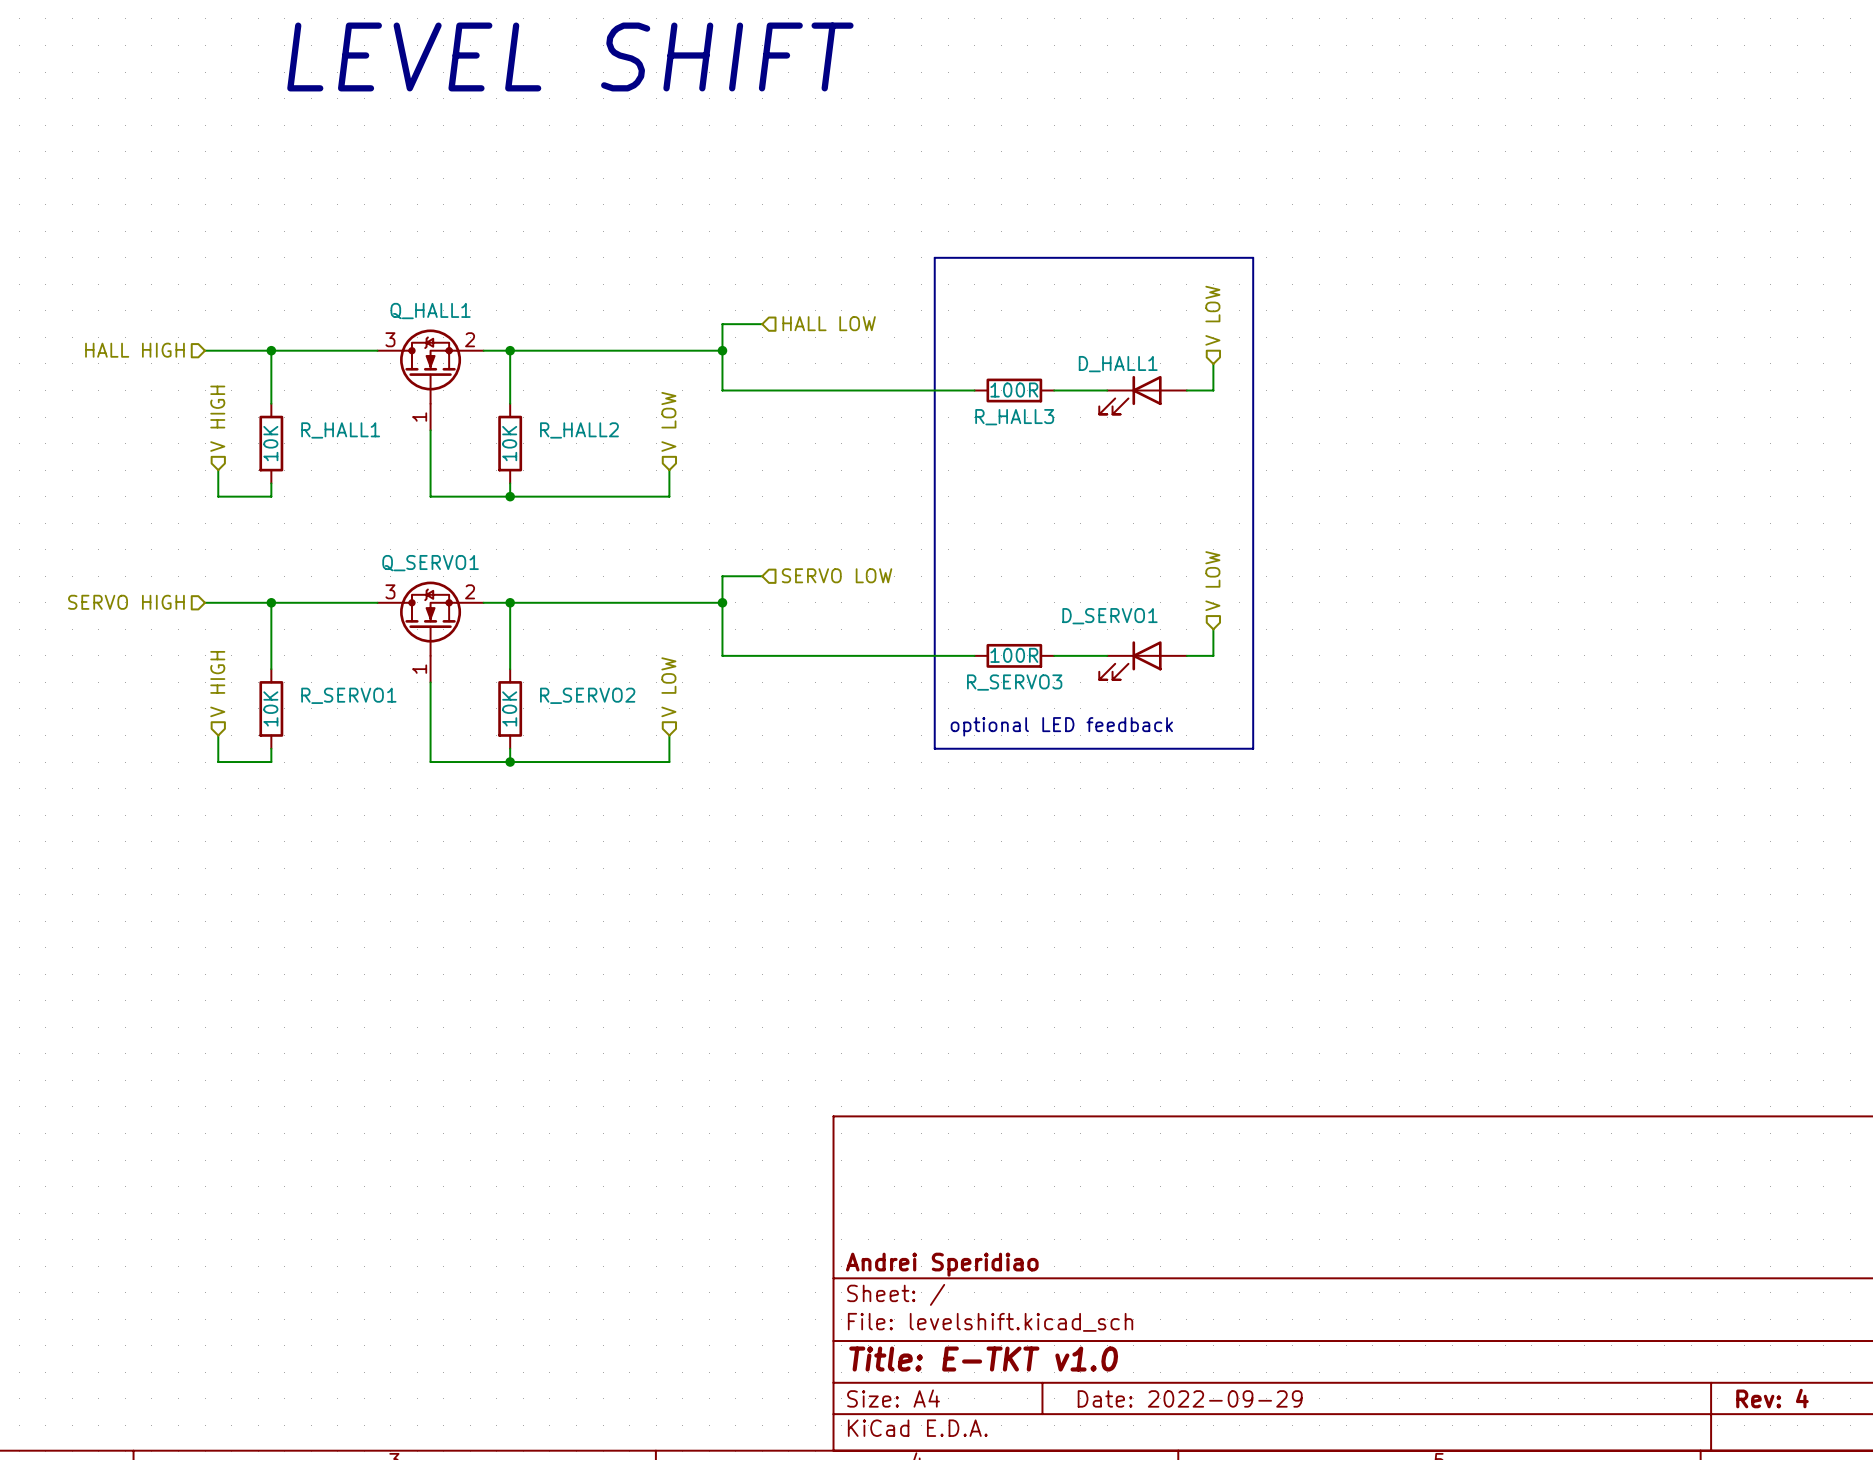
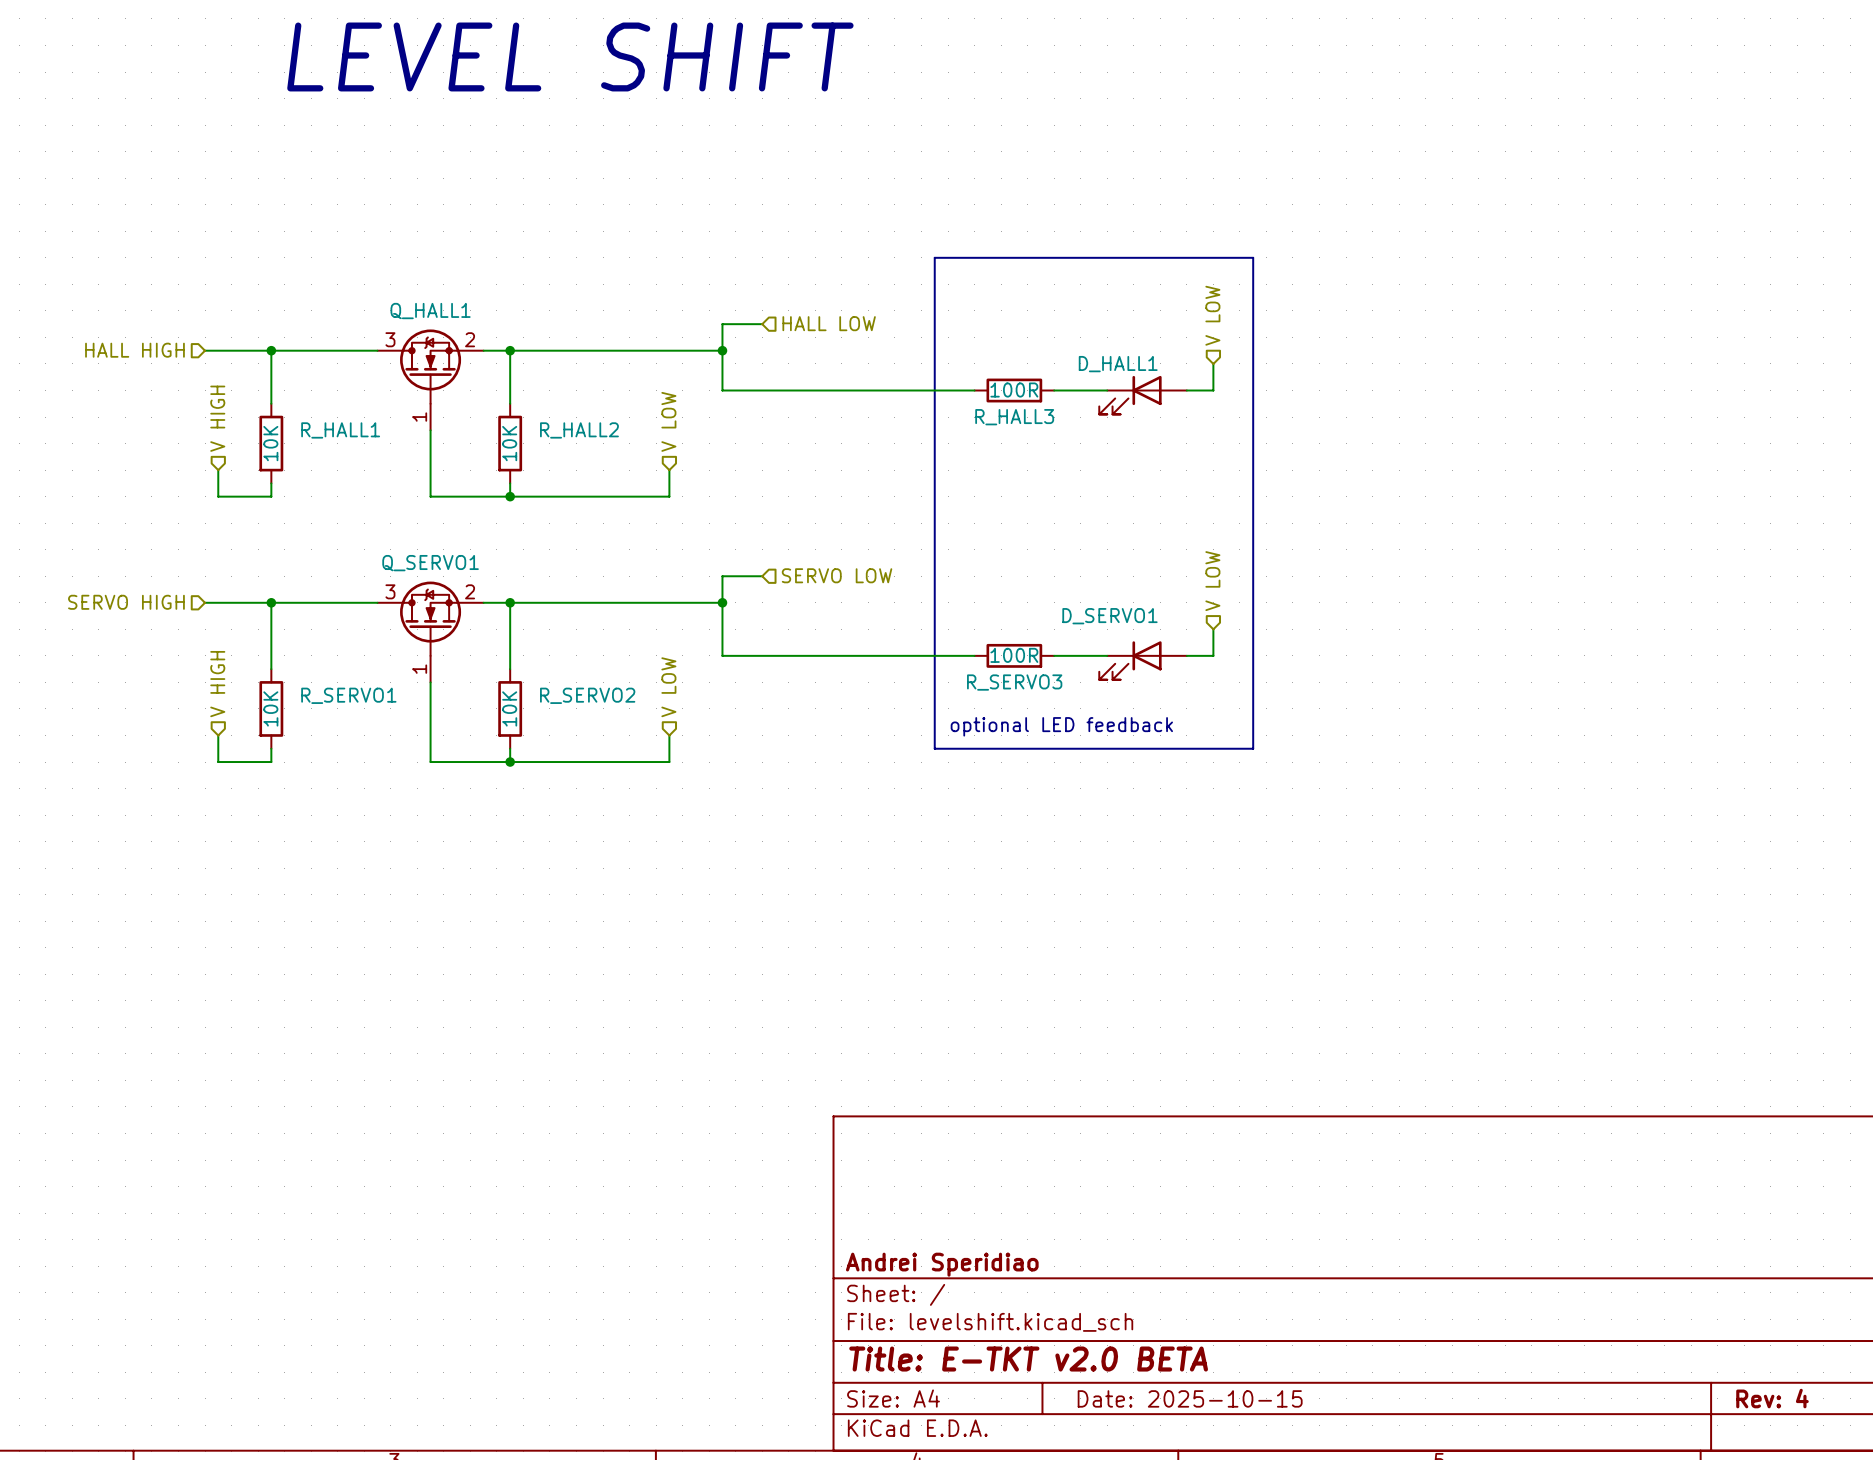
title block: Title: E-TKT v1.0 (983, 1359) -> Title: E-TKT v2.0 BETA (1028, 1359)
title block: Date: 2022-09-29 (1190, 1398) -> Date: 2025-10-15 (1190, 1398)

